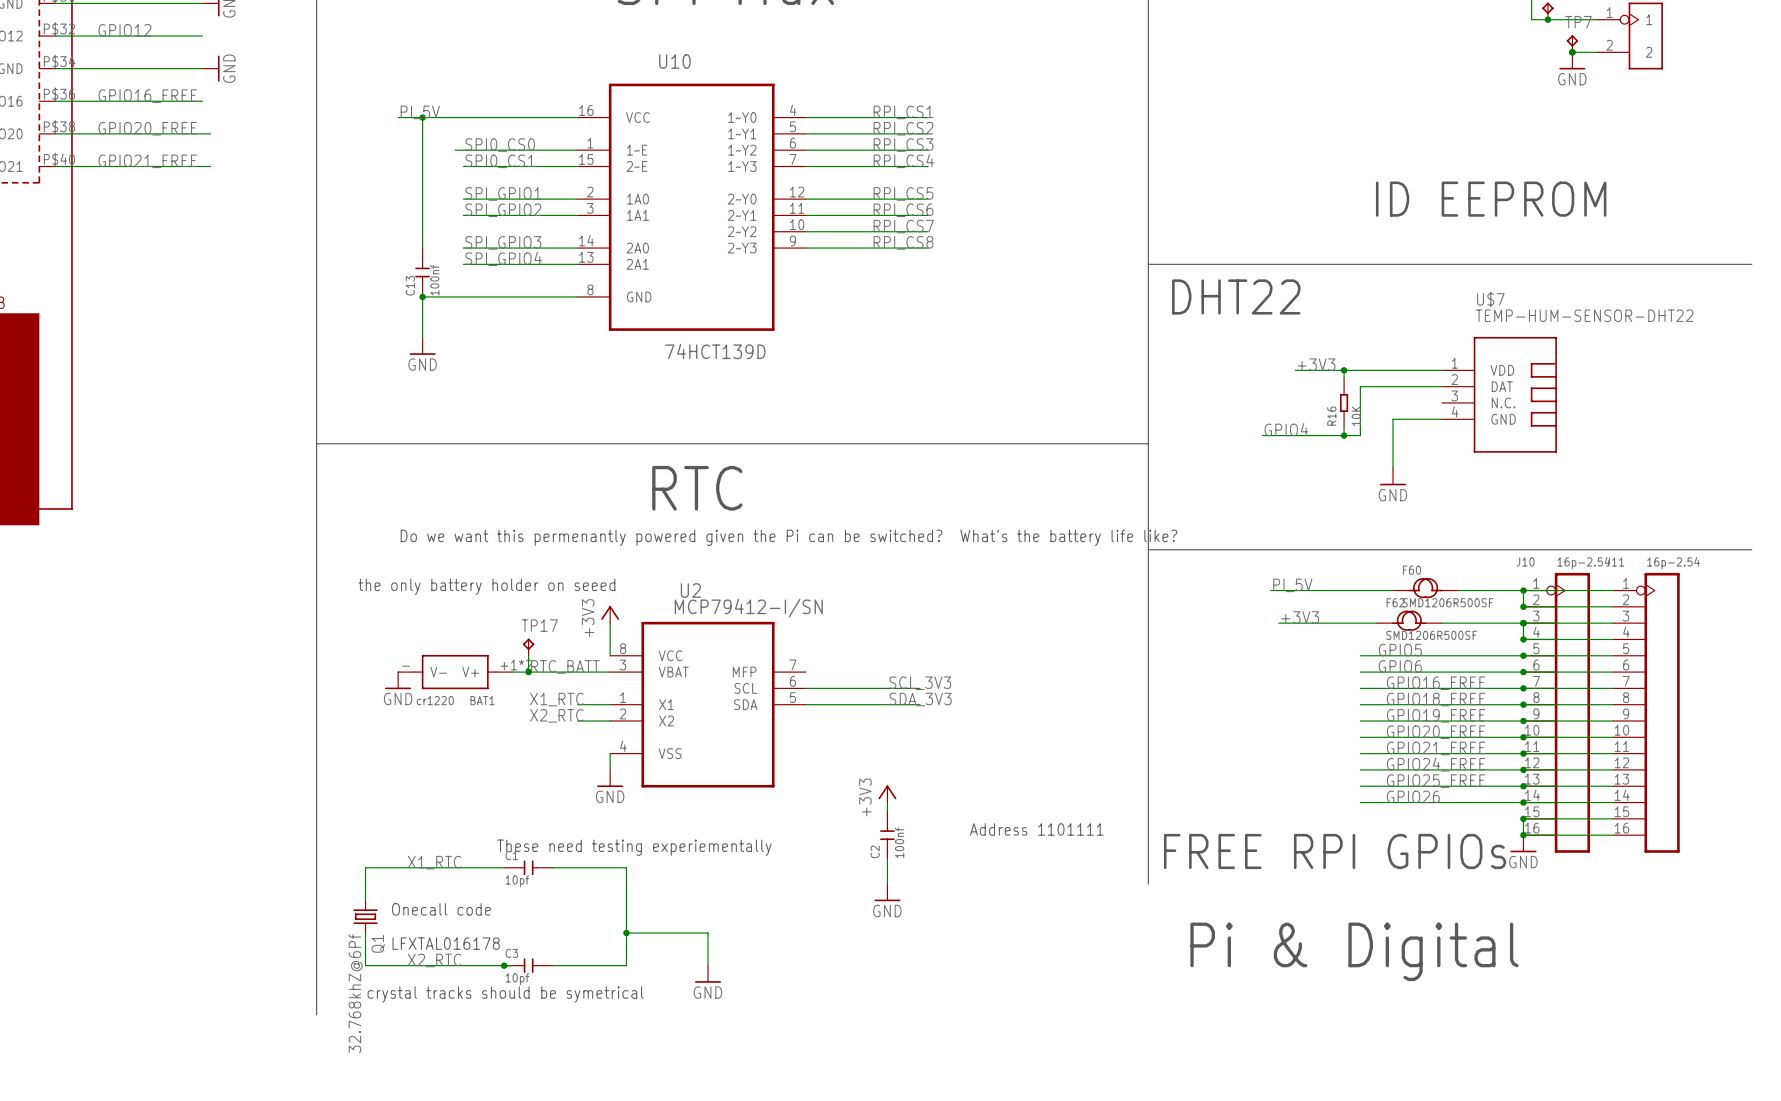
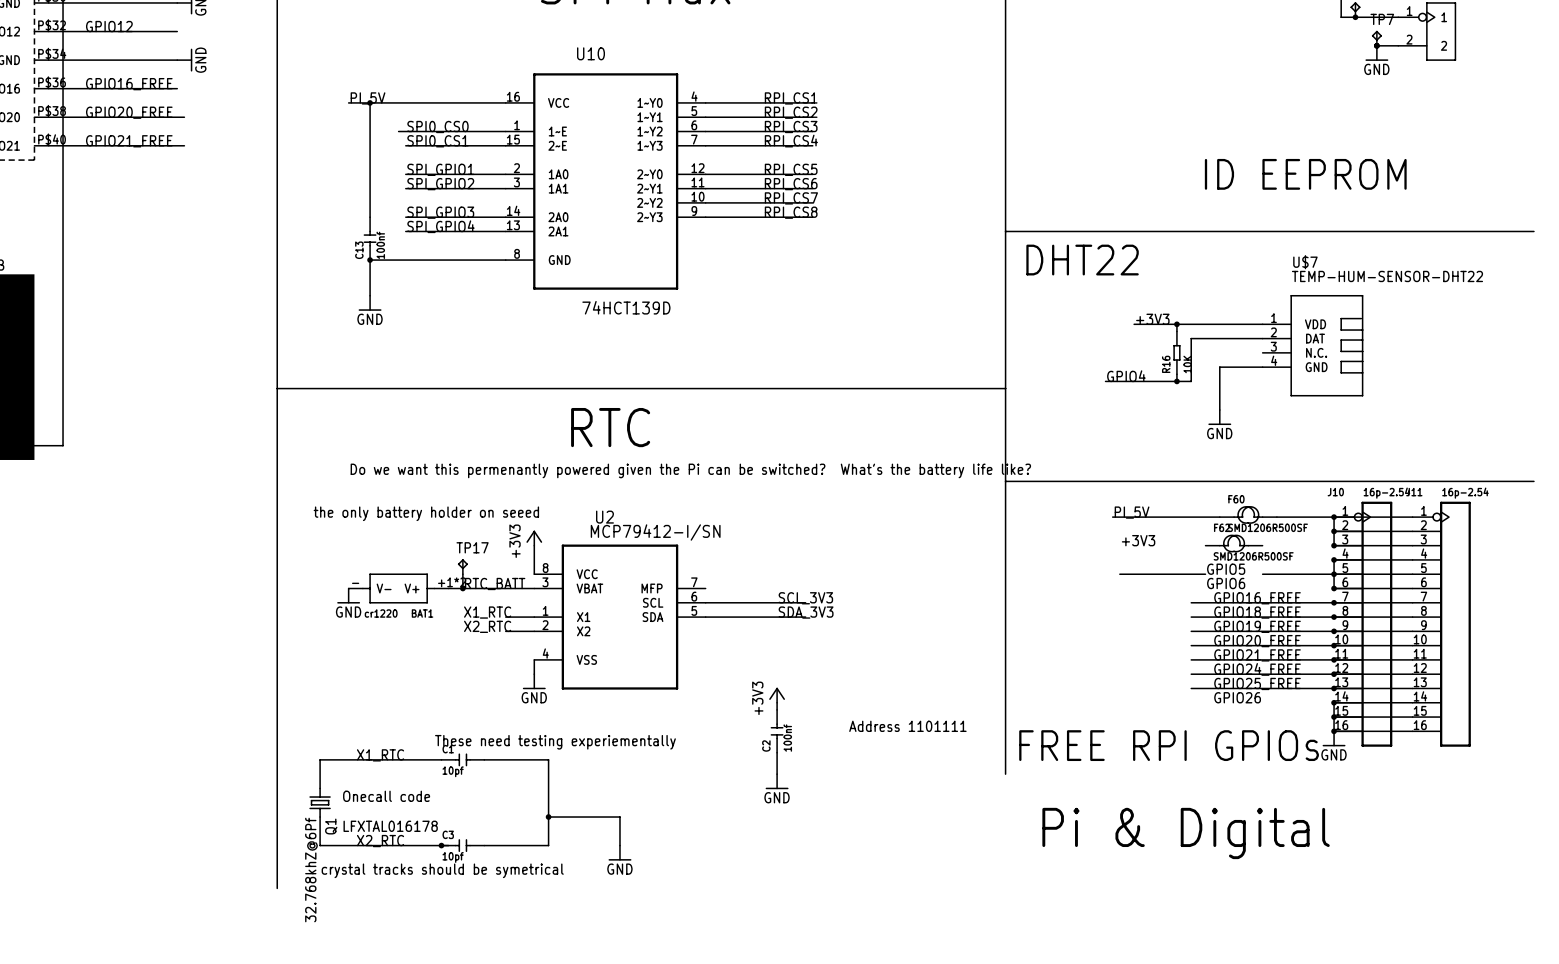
wire: none -> (1334, 531) (1334, 545)
wire: (1278, 623) (1376, 623) -> none
wire: (1441, 623) (1523, 623) (1523, 639) -> (1334, 588) (1334, 559)
wire: none -> (1119, 574) (1191, 574)
wire: (1376, 655) (1441, 655) -> none
wire: (1360, 672) (1523, 672) -> none
wire: (1360, 802) (1523, 802) -> (1334, 717) (1334, 702)

